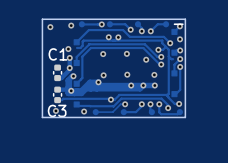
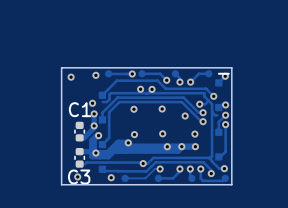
via: (180, 39) -> none

